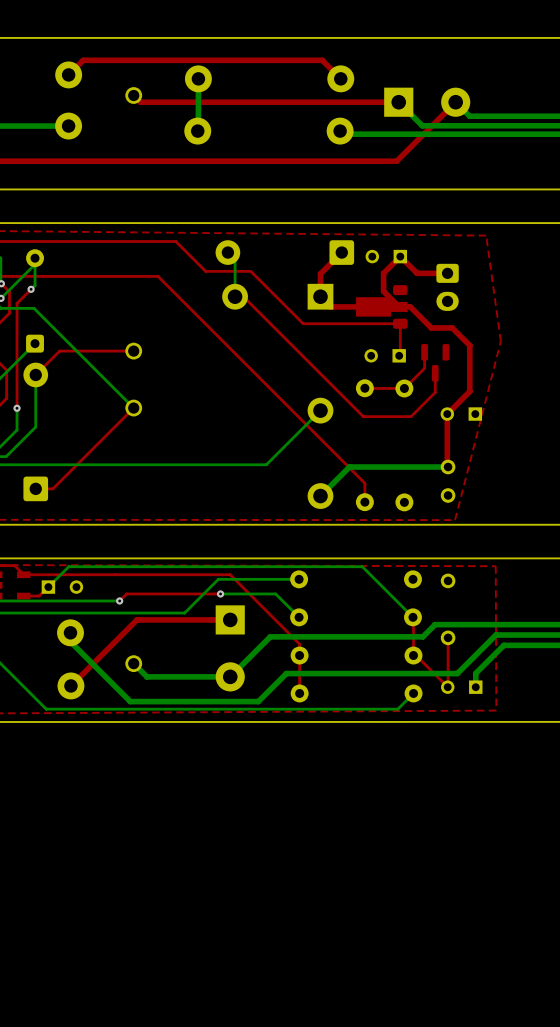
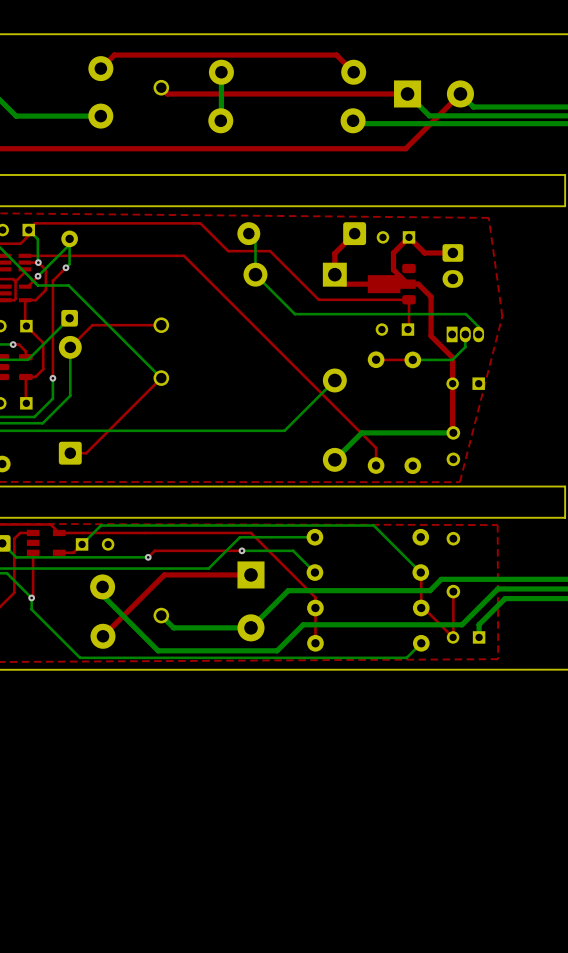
top track: (235, 296) (243, 296) (363, 416) (411, 416) (435, 392) (435, 373) -> none
bottom track: none -> (255, 274) (294, 314) (465, 314) (478, 326) (478, 336)
top track: (424, 320) (431, 327) (452, 327) (469, 345) (469, 391) (447, 414) -> (431, 296) (431, 336) (452, 357) (452, 383)
top track: (424, 352) (424, 368) (404, 388) -> none
bottom track: none -> (465, 334) (465, 347) (452, 359) (412, 359)
part: none -> (465, 334)
part: (435, 362) -> none

